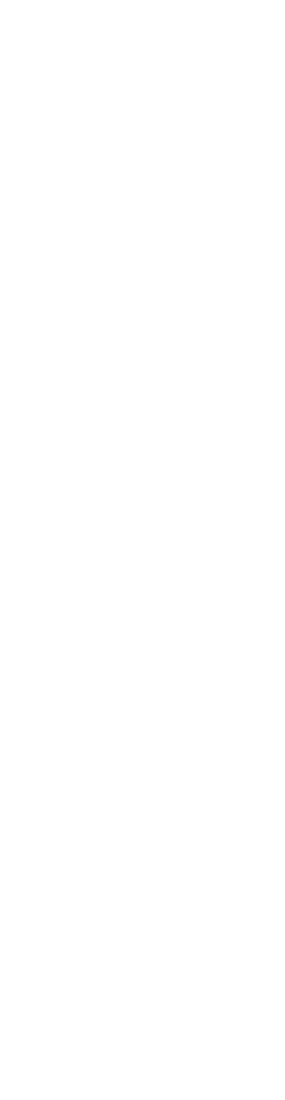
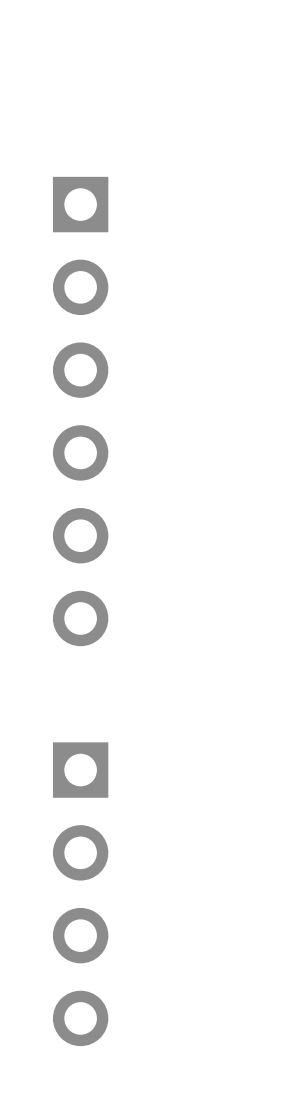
part: none -> (80, 411)
part: none -> (80, 894)

